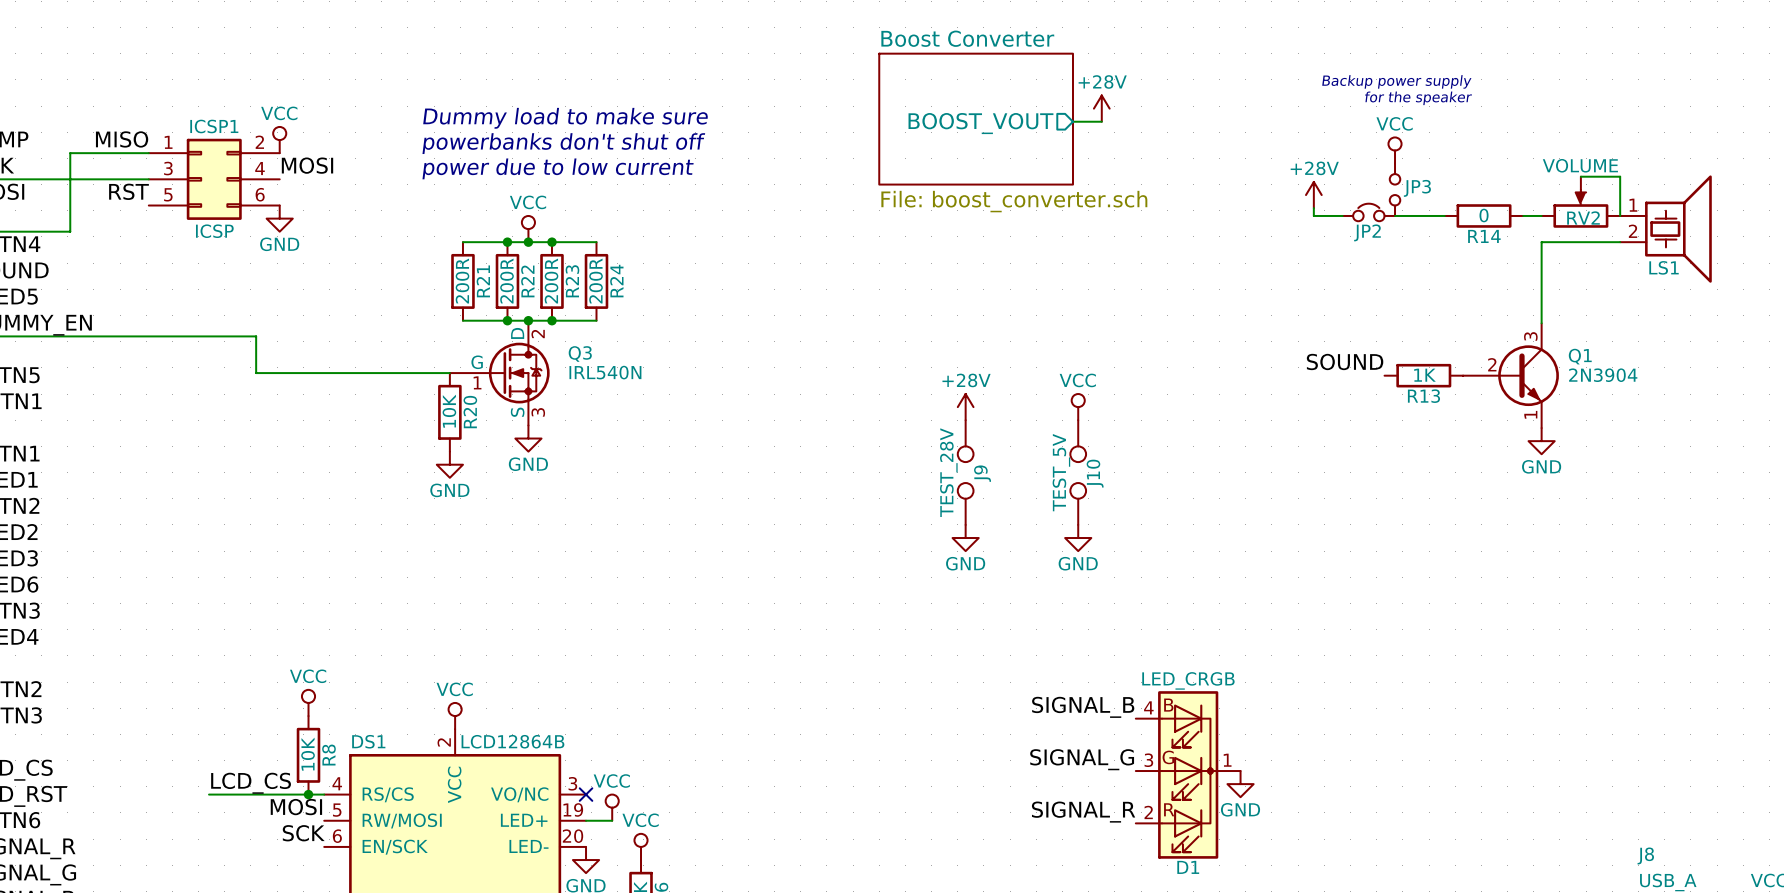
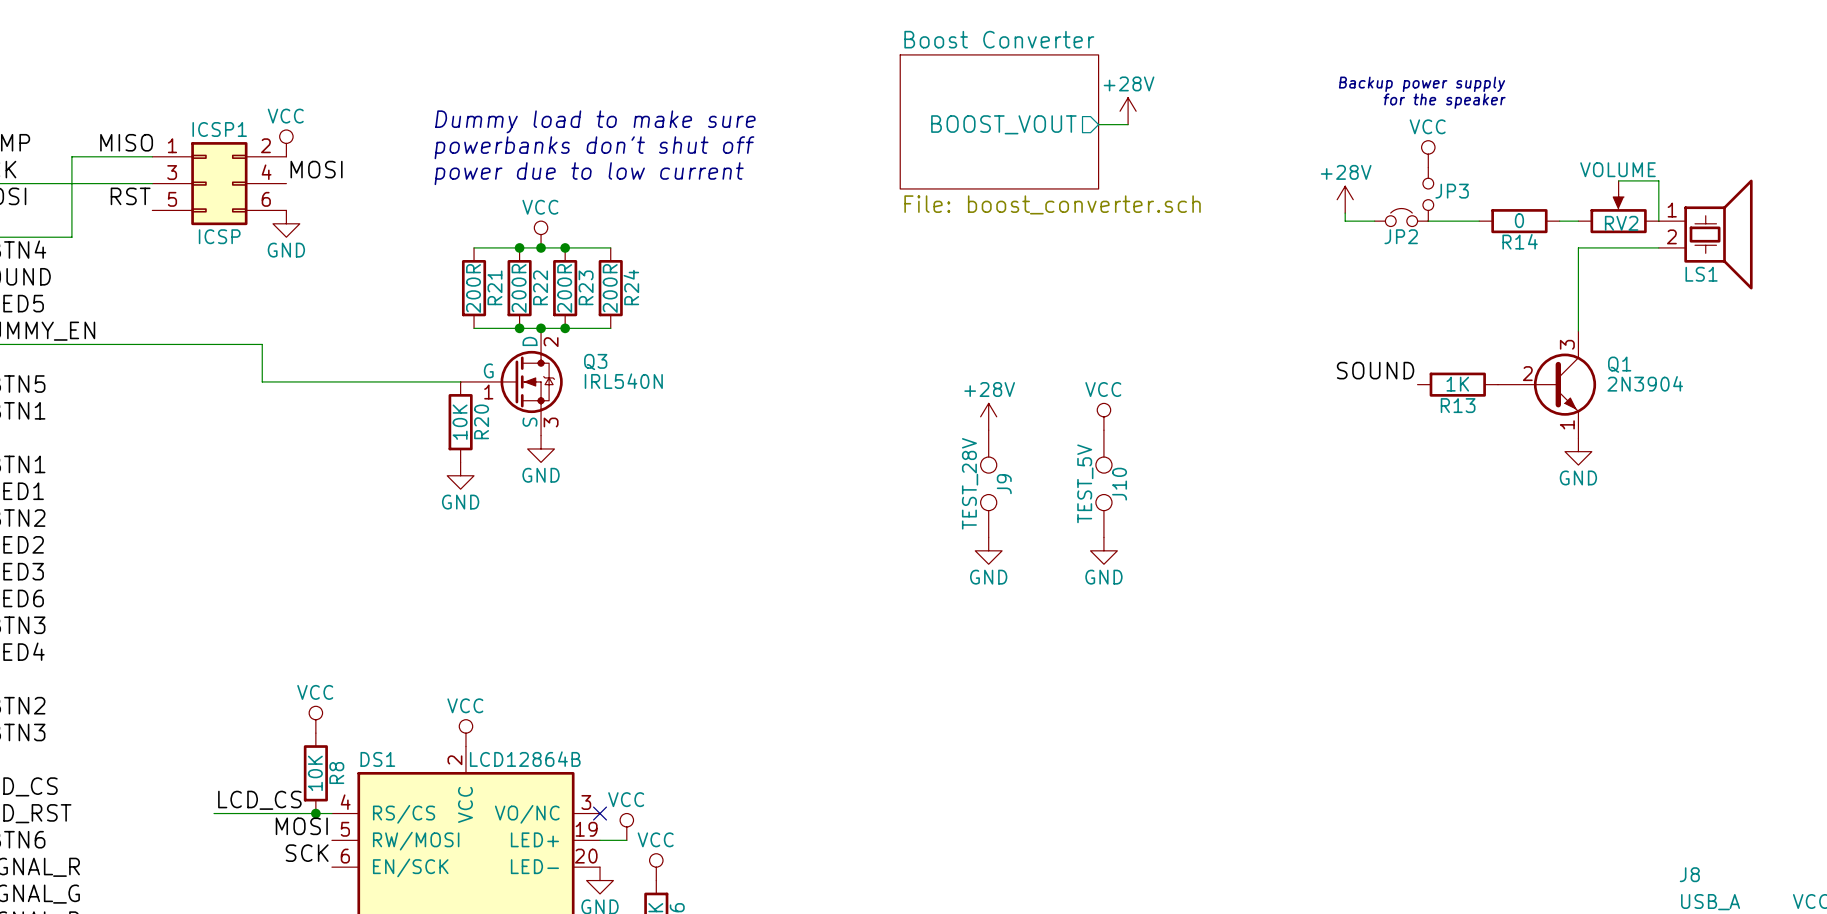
label: SIGNAL_B (1083, 707) -> none
label: SIGNAL_G (1082, 759) -> none
D1: LED_CRGB (1188, 774) -> none
power symbol: GND (1240, 784) -> none
label: SIGNAL_R (1083, 812) -> none

